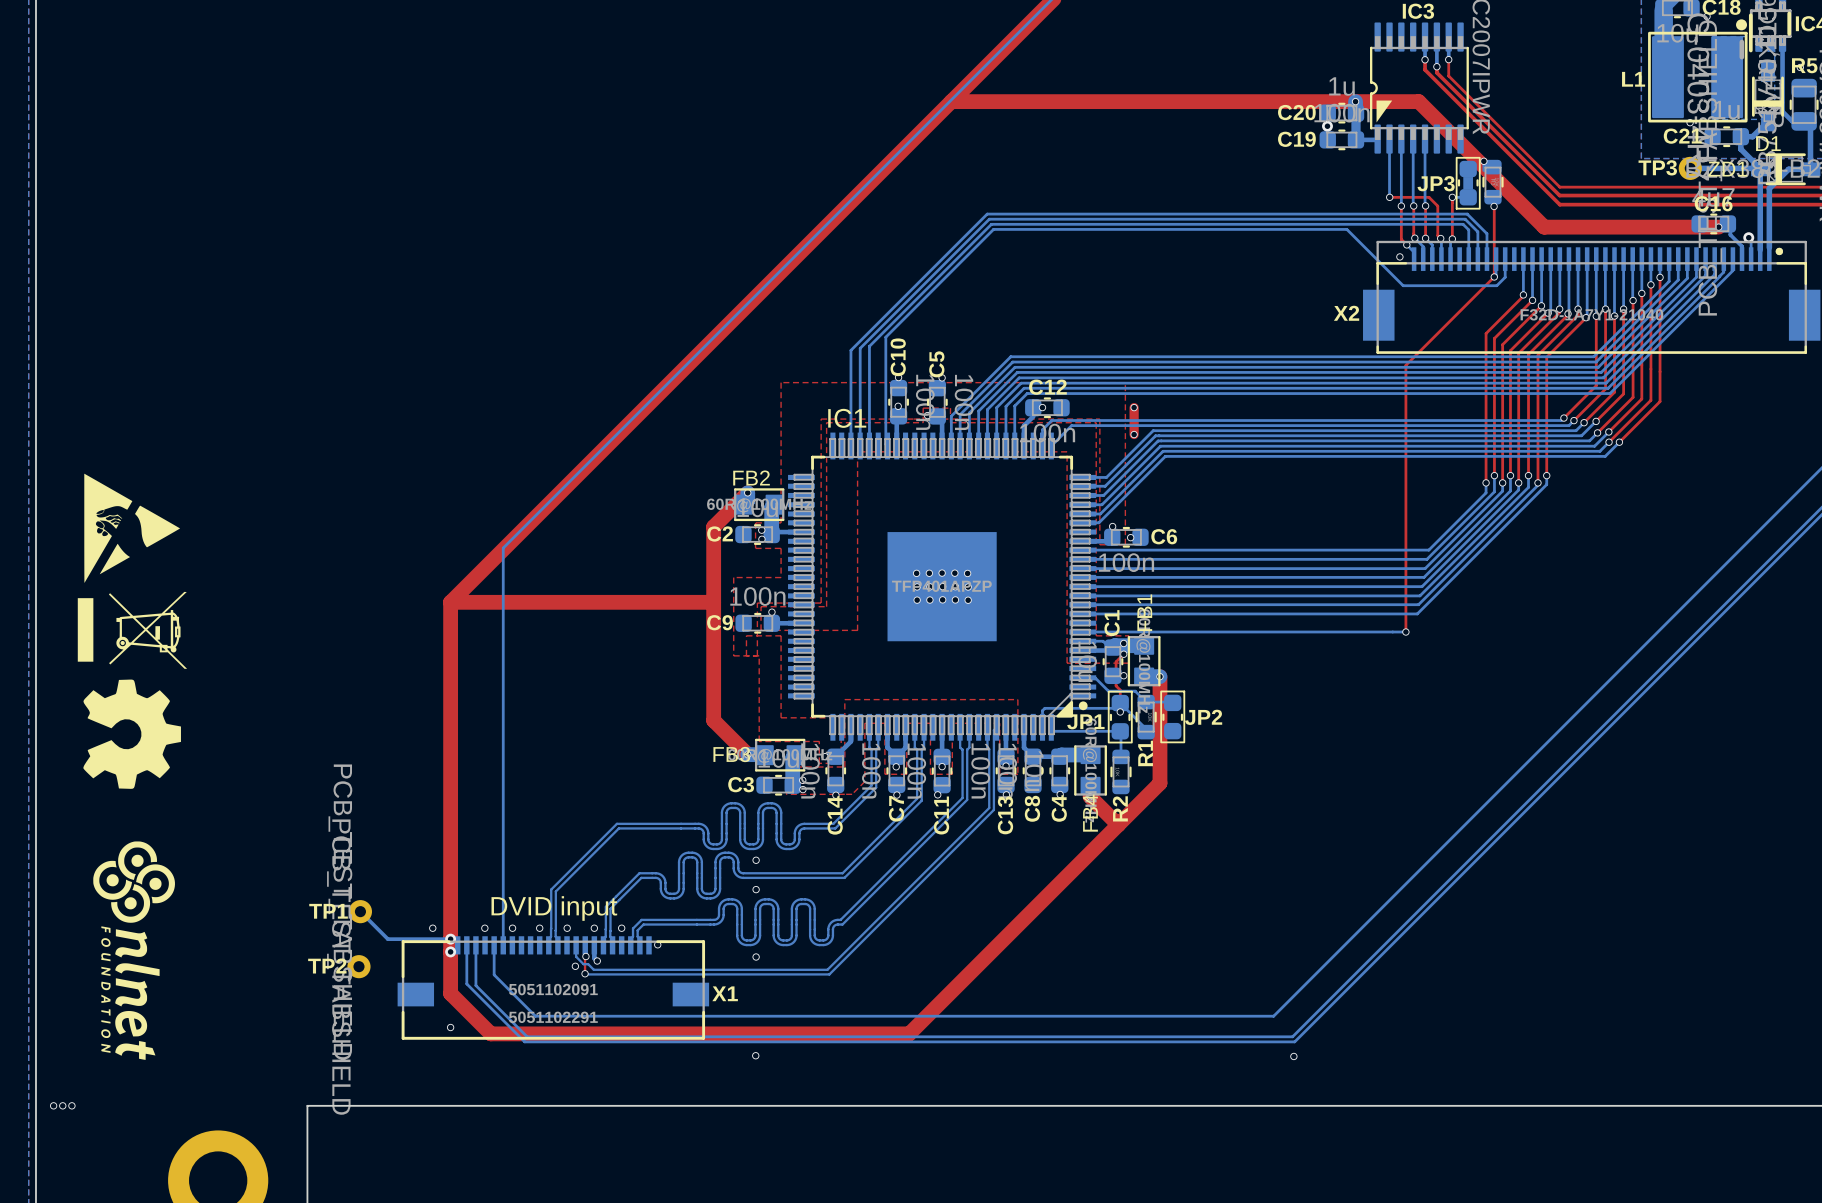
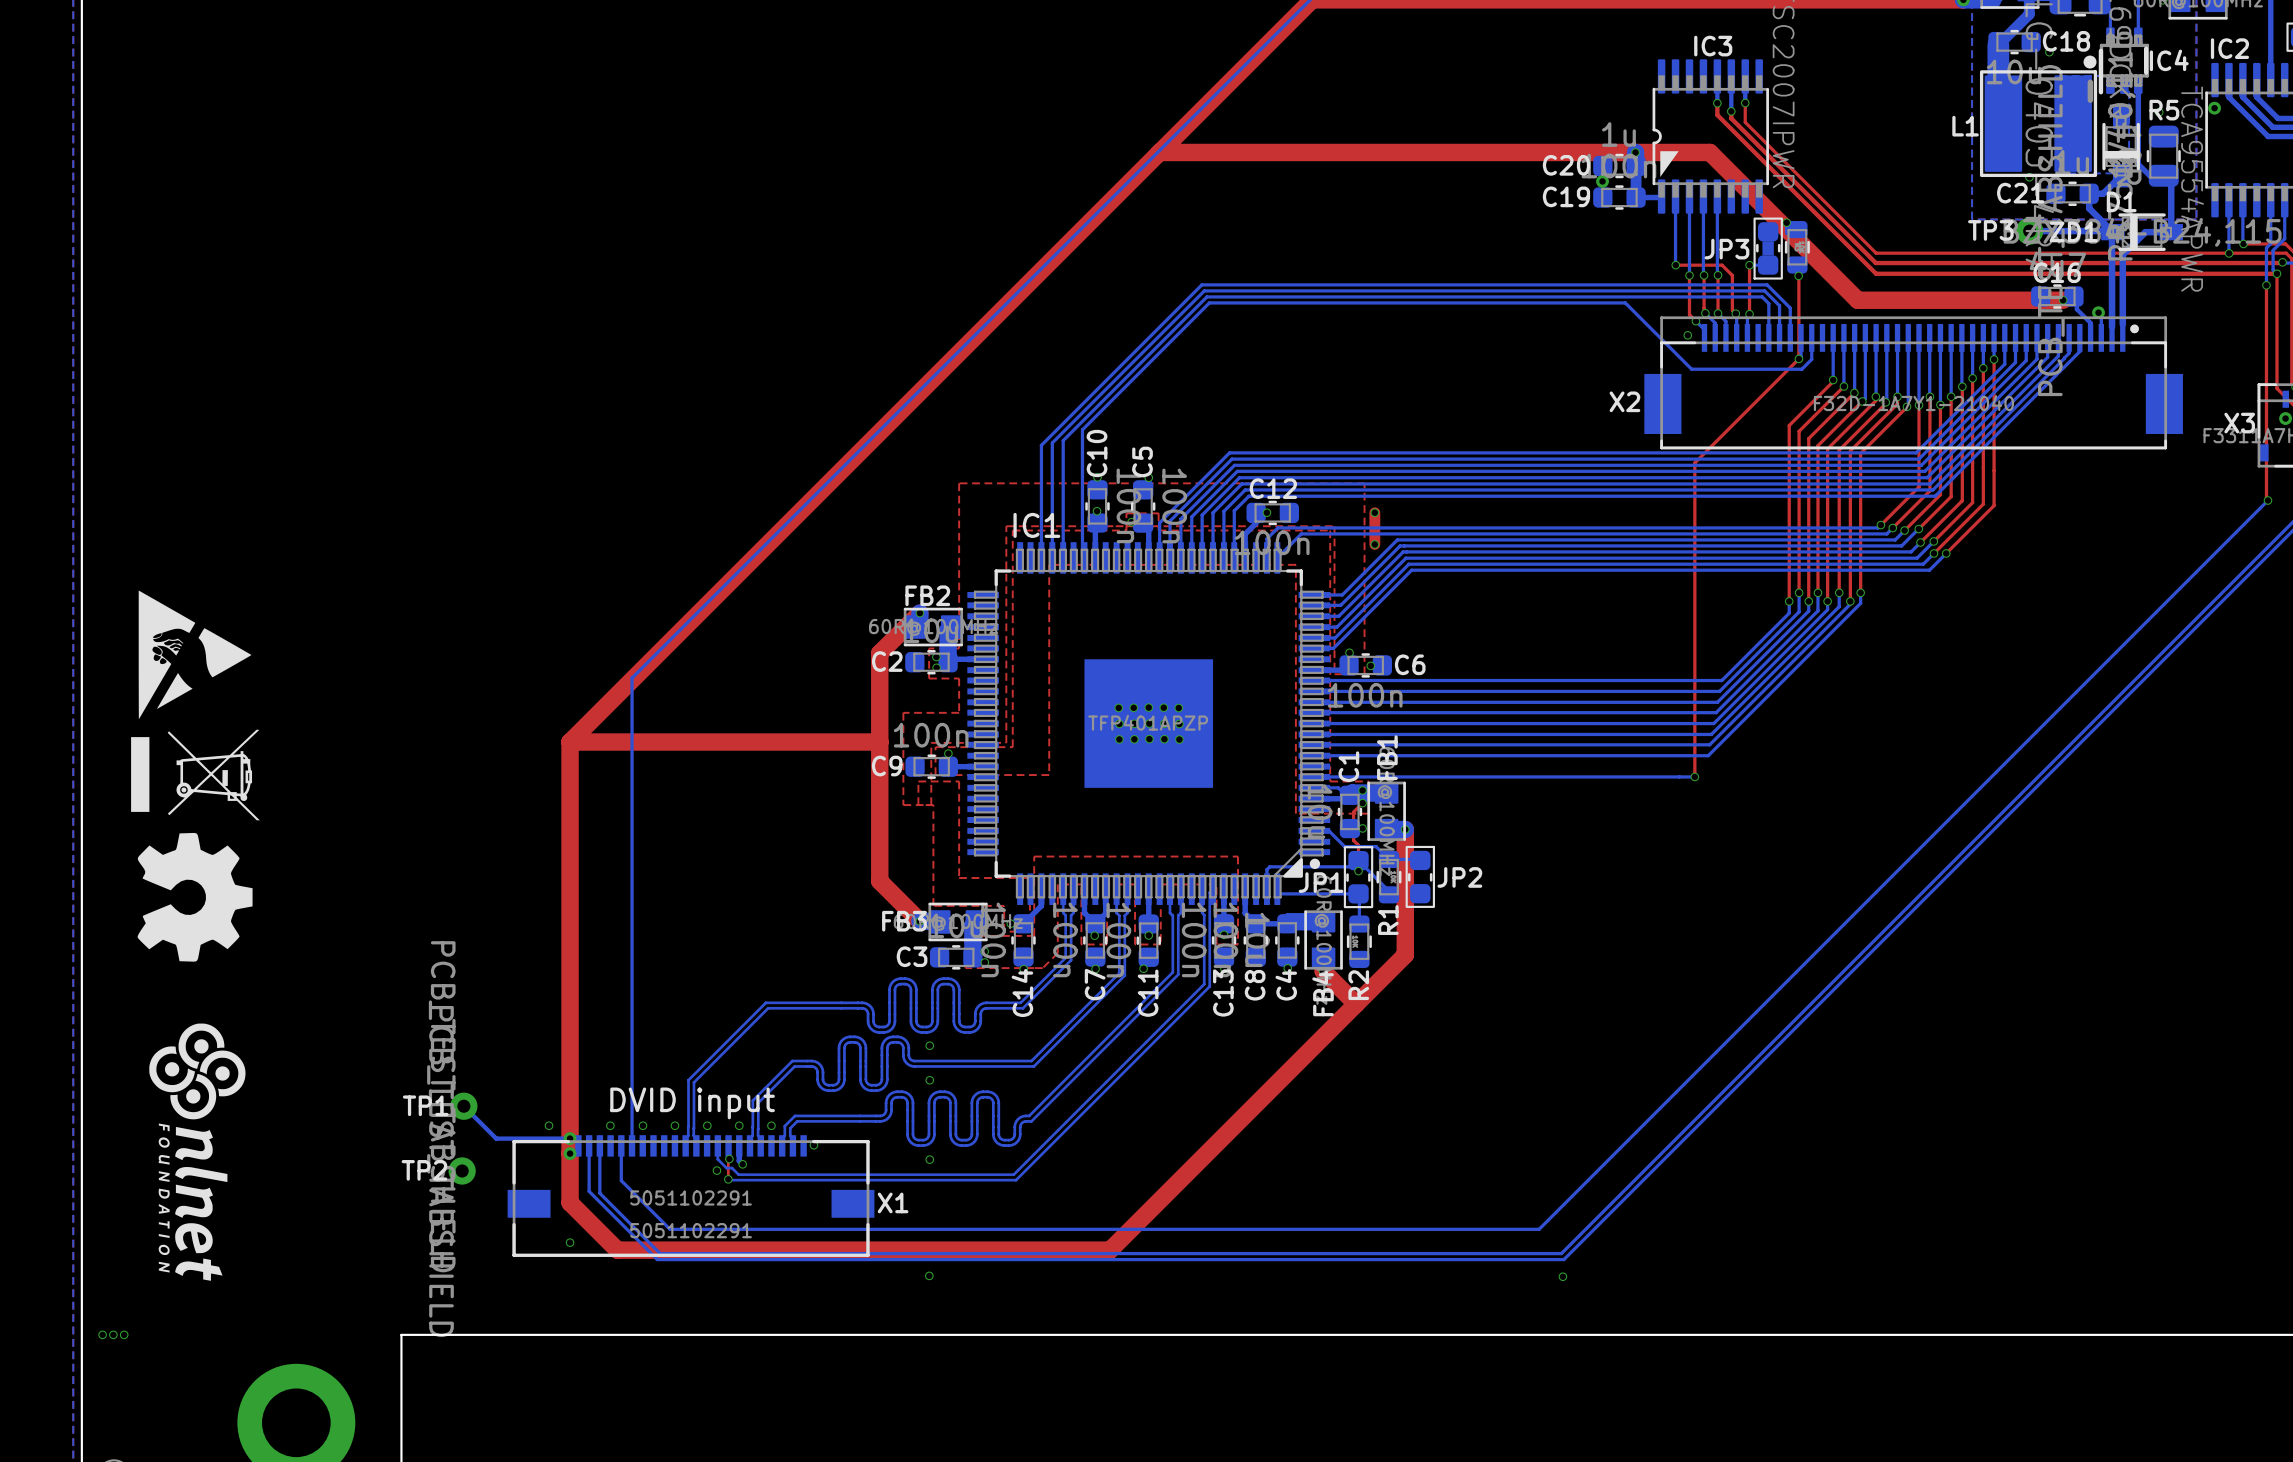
X1 value: 5051102091 (553, 989) -> 5051102291 (691, 1197)

